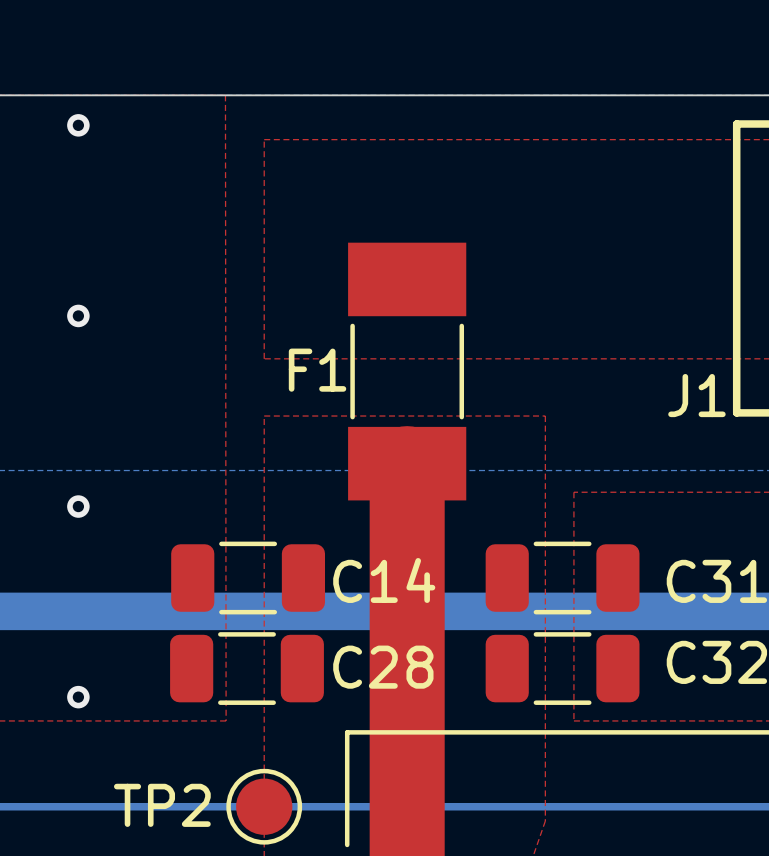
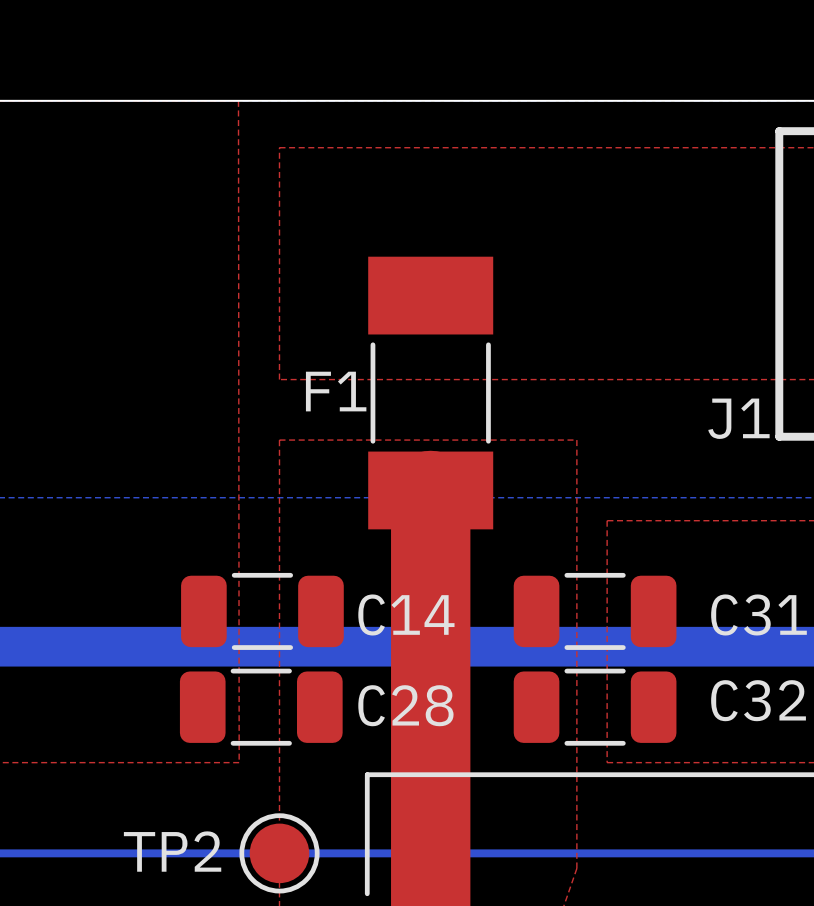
via: (78, 125) -> none
via: (78, 315) -> none
via: (78, 506) -> none
via: (78, 697) -> none

